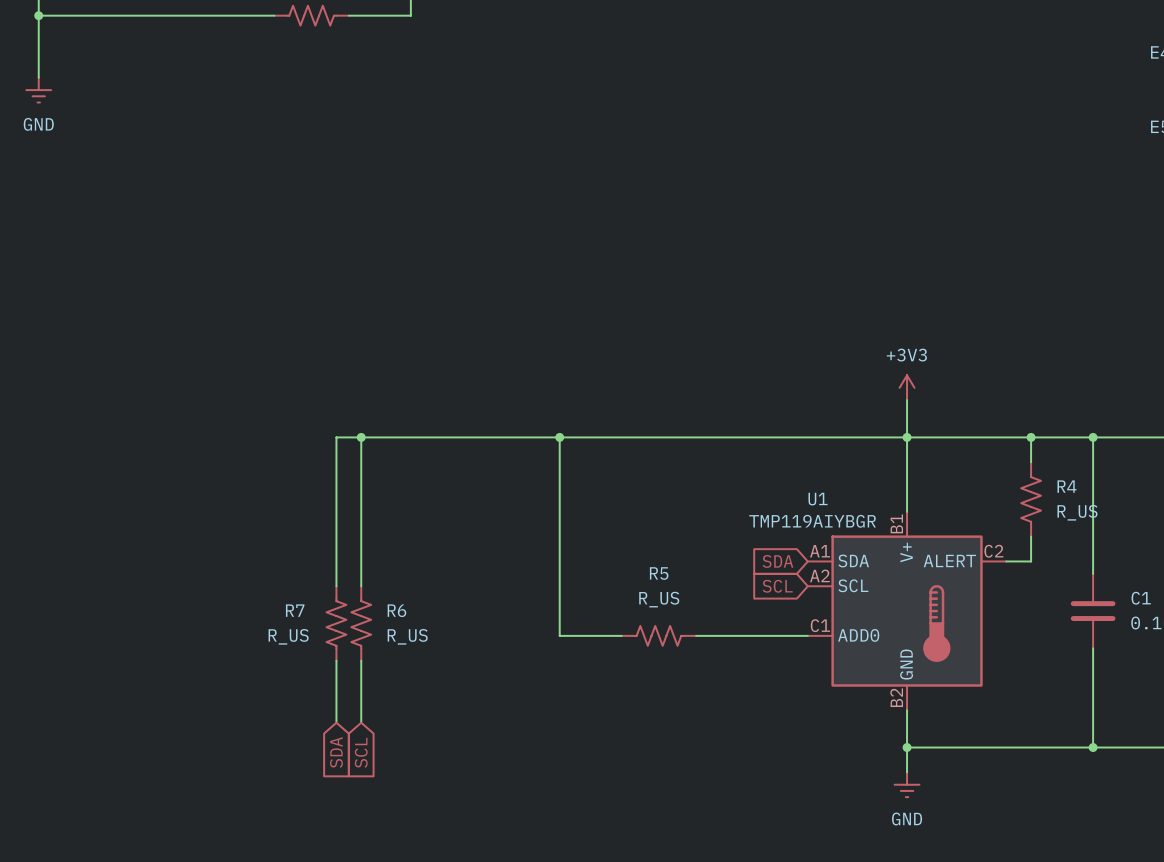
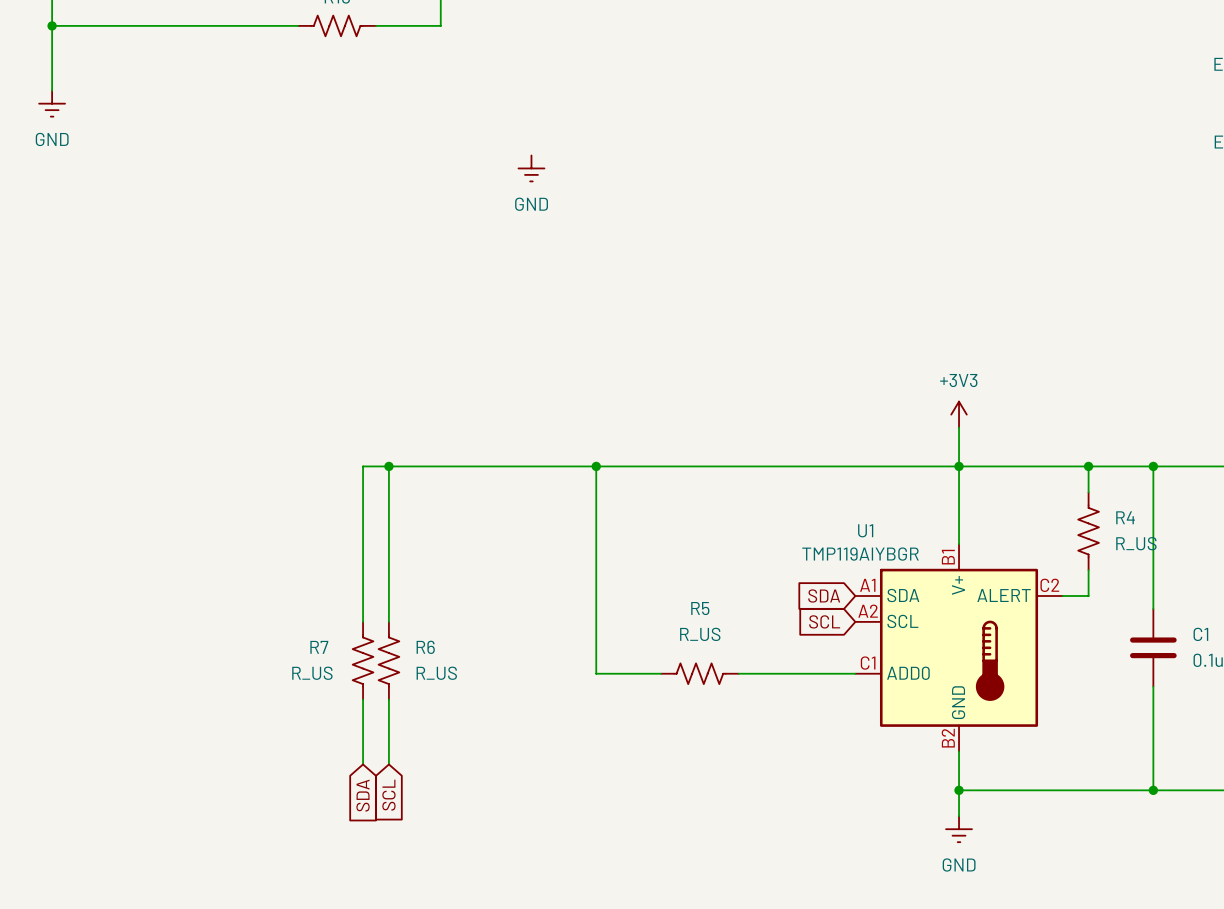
power symbol: none -> GND (531, 168)

